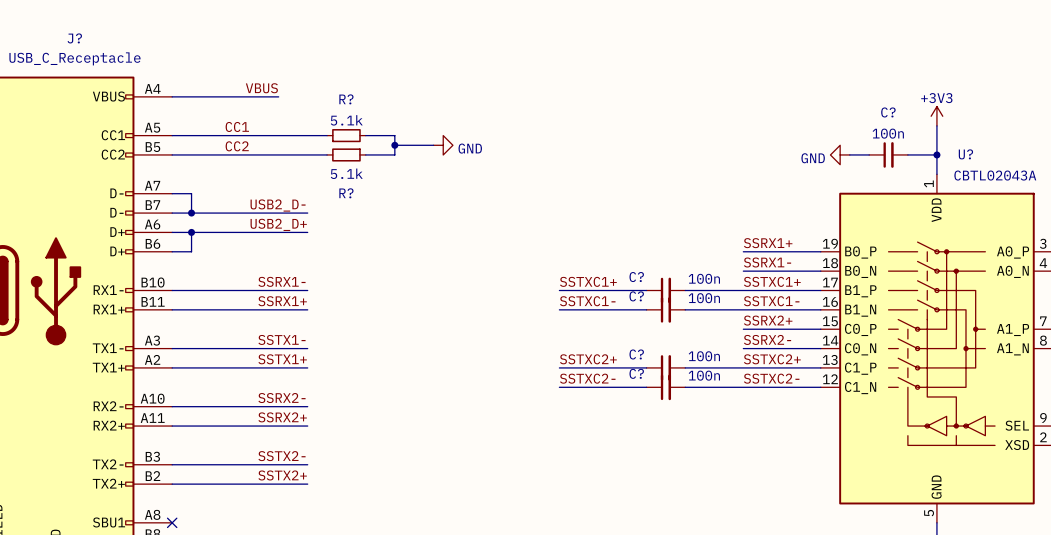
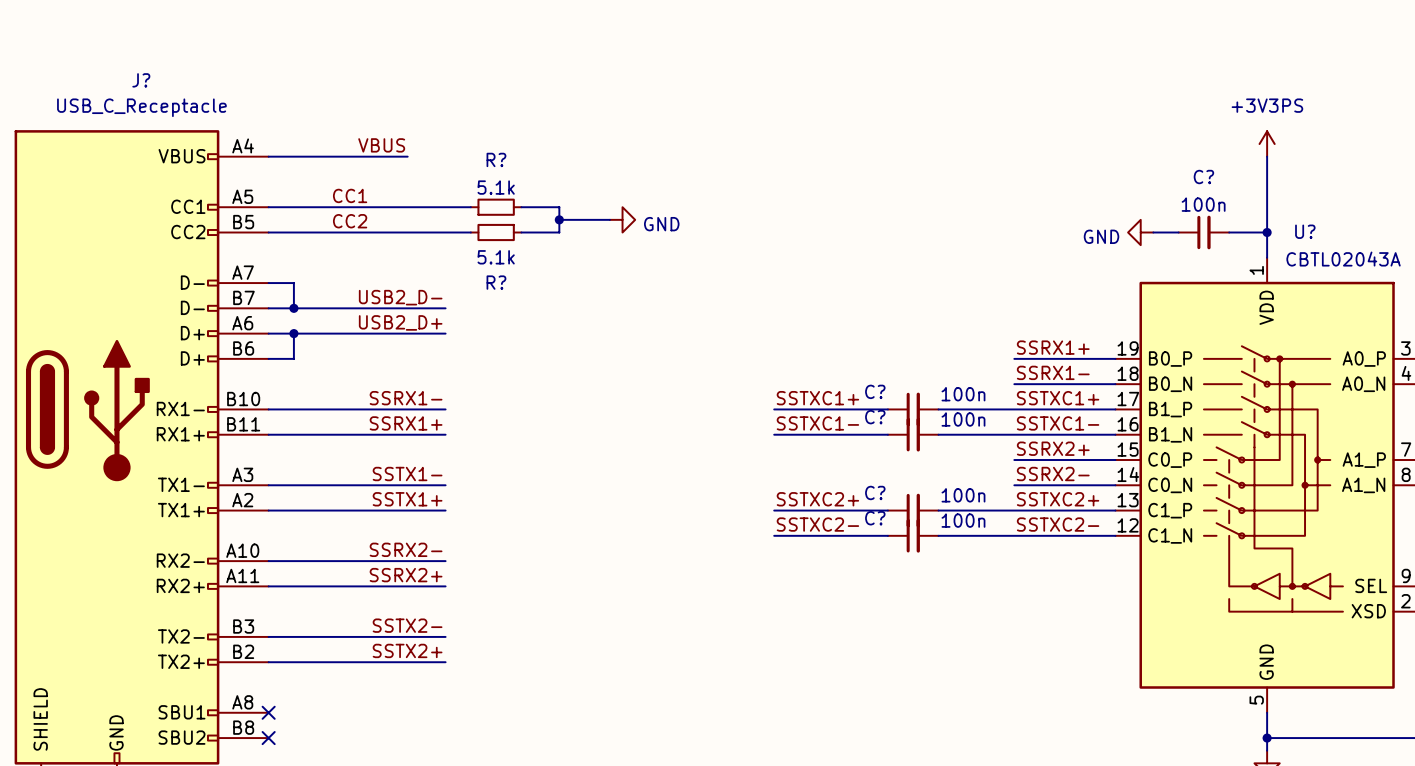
power symbol: none -> +3V3PS (1267, 144)
power symbol: +3V3 (936, 116) -> none

